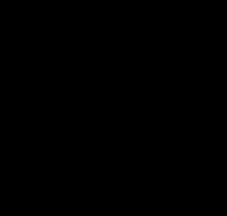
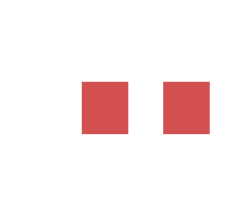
part: none -> (145, 107)

